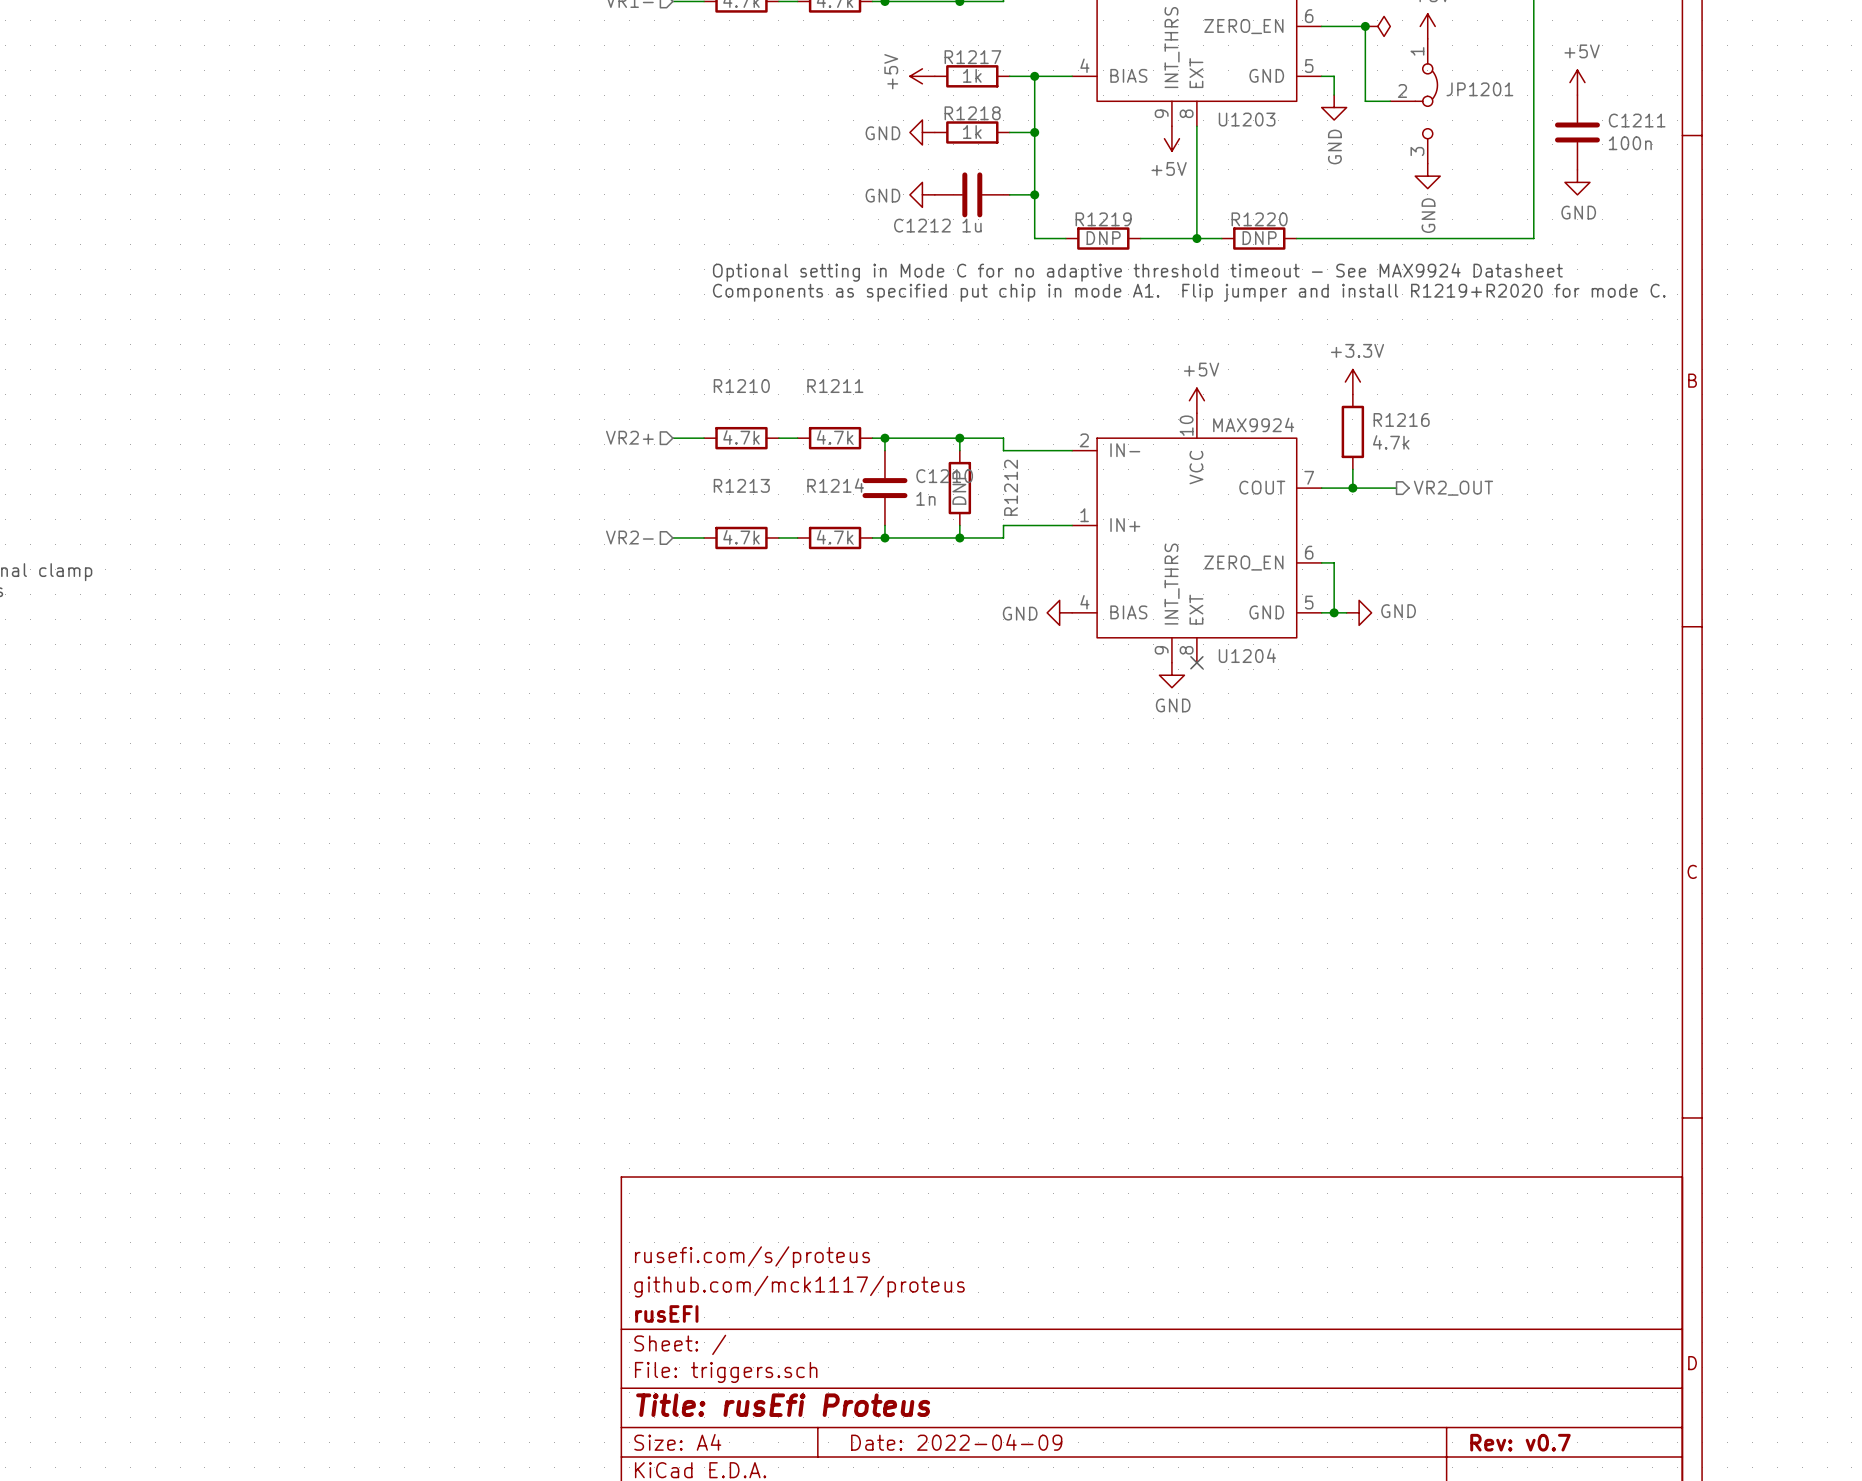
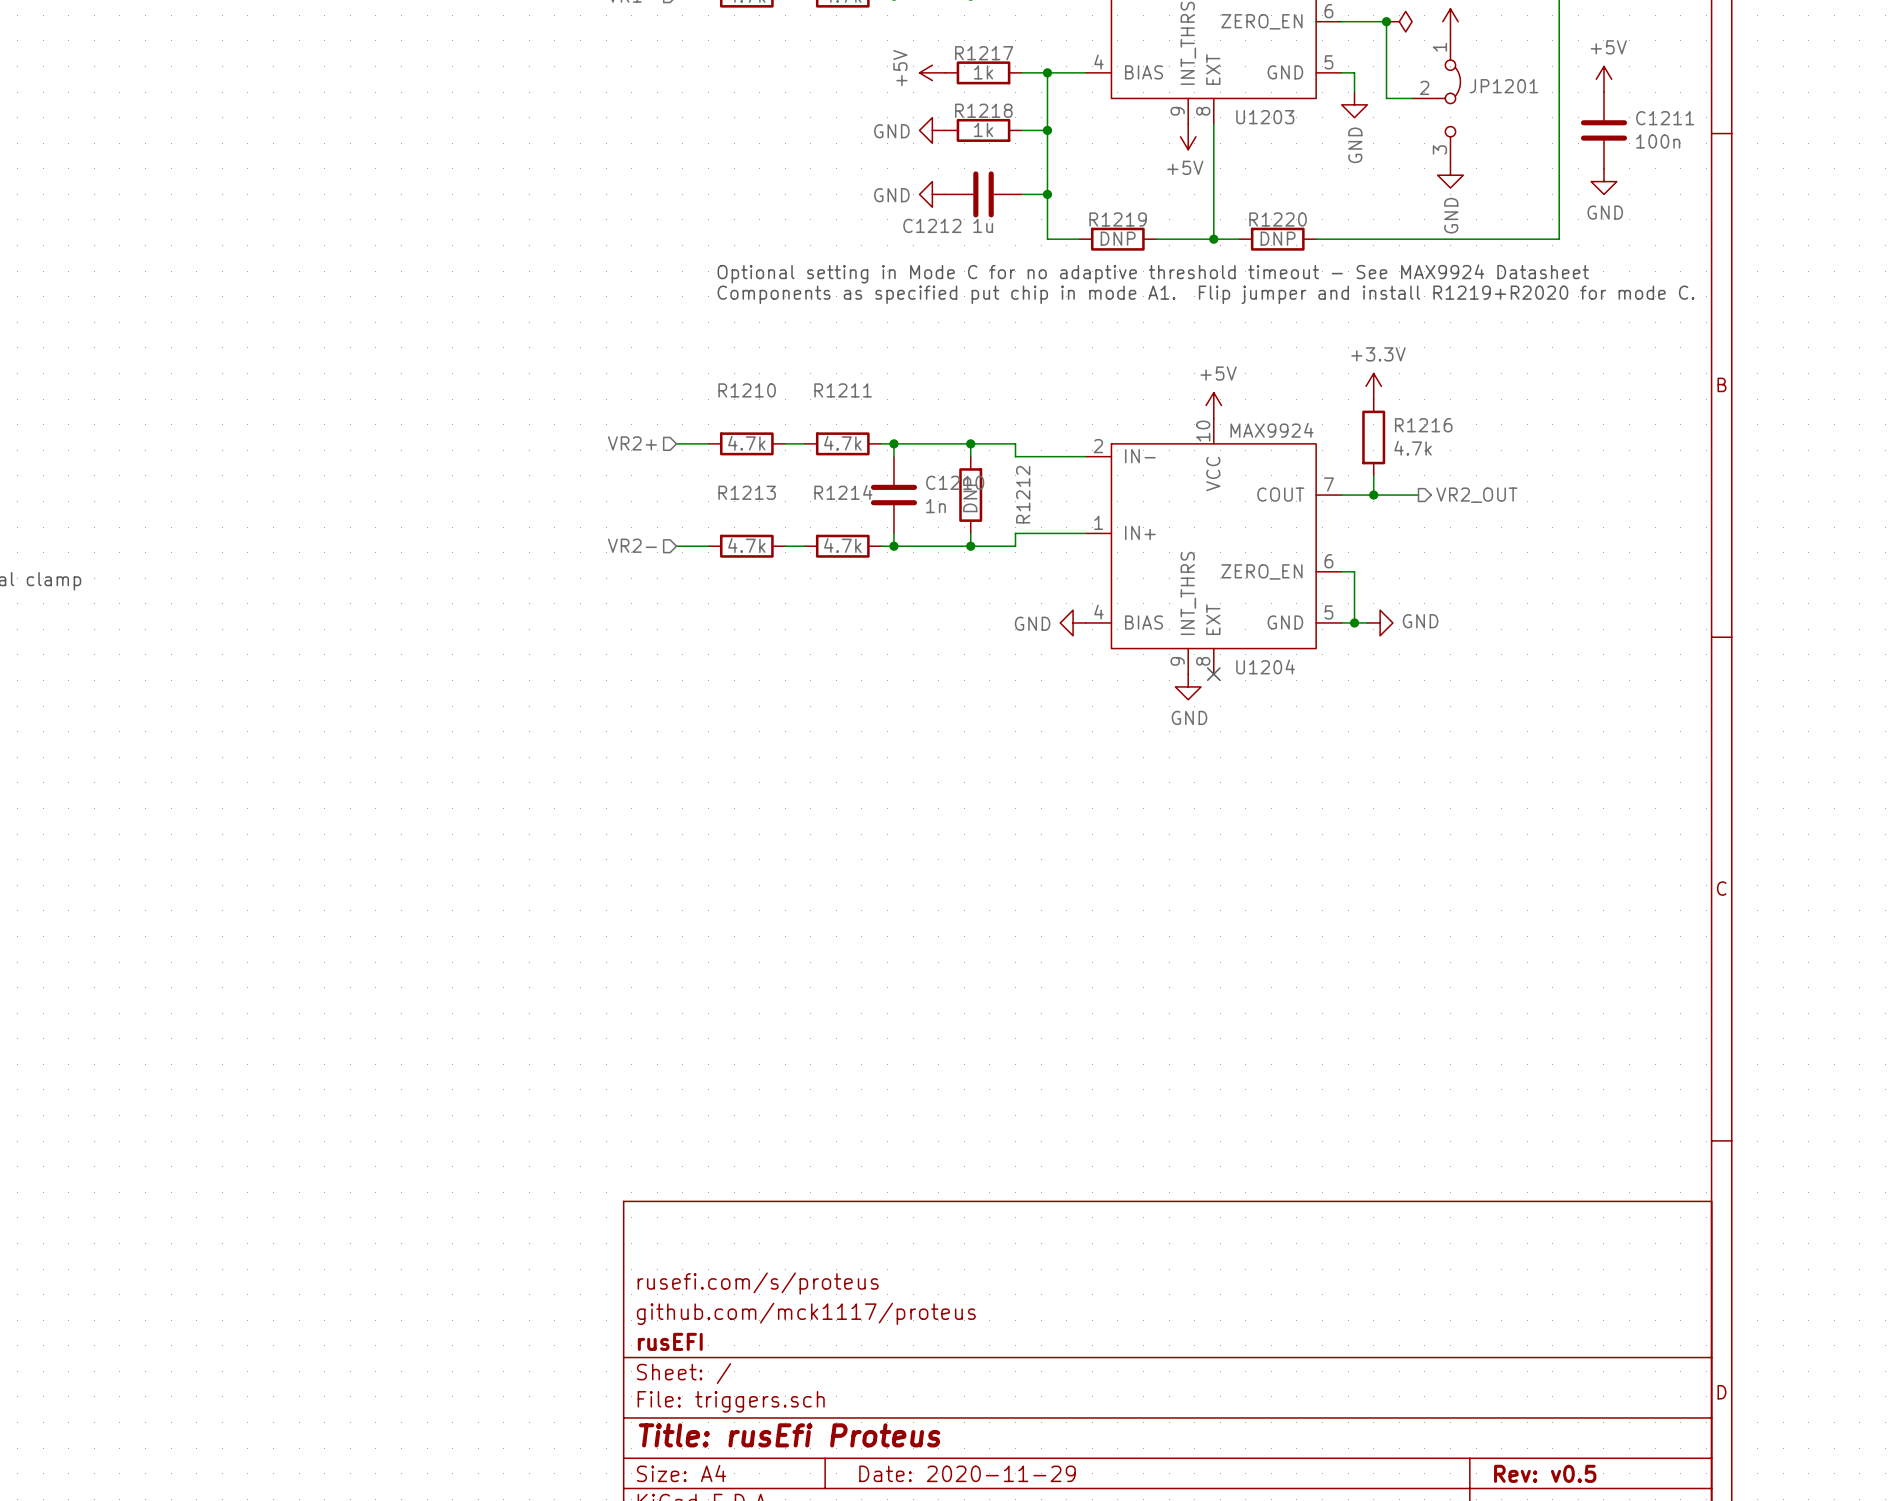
title block: Date: 2022-04-09 (956, 1442) -> Date: 2020-11-29 (967, 1473)
title block: Rev: v0.7 (1520, 1442) -> Rev: v0.5 (1545, 1473)

